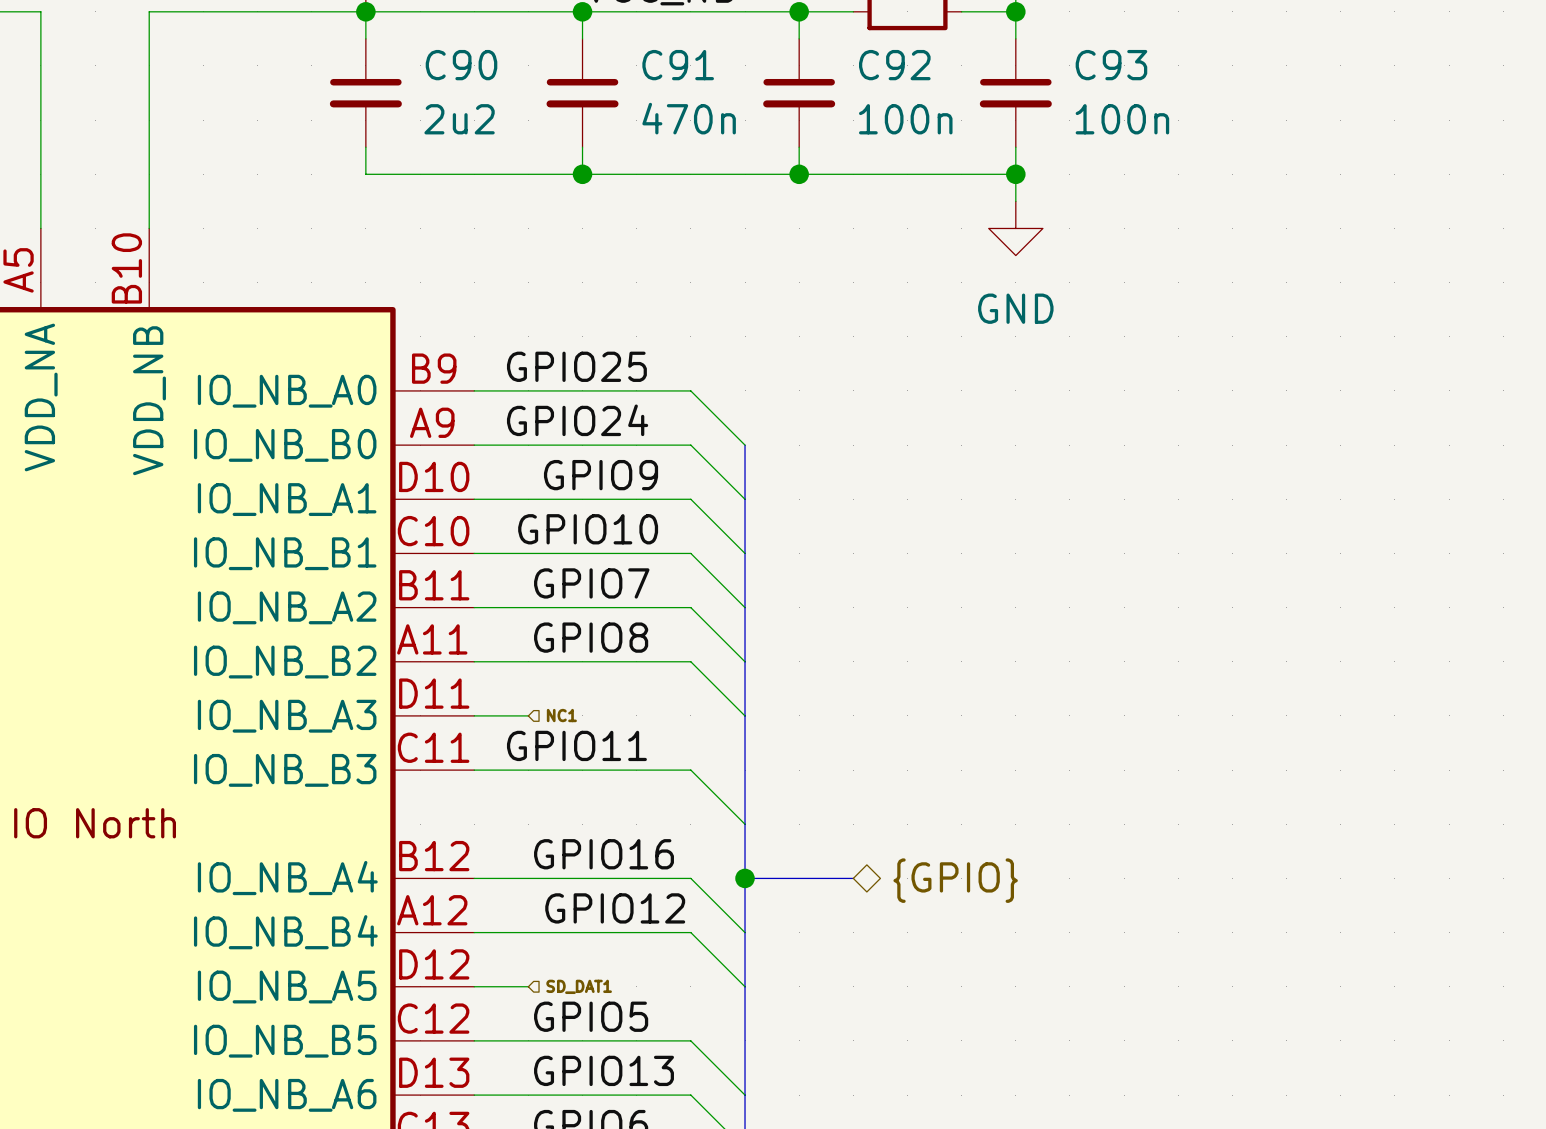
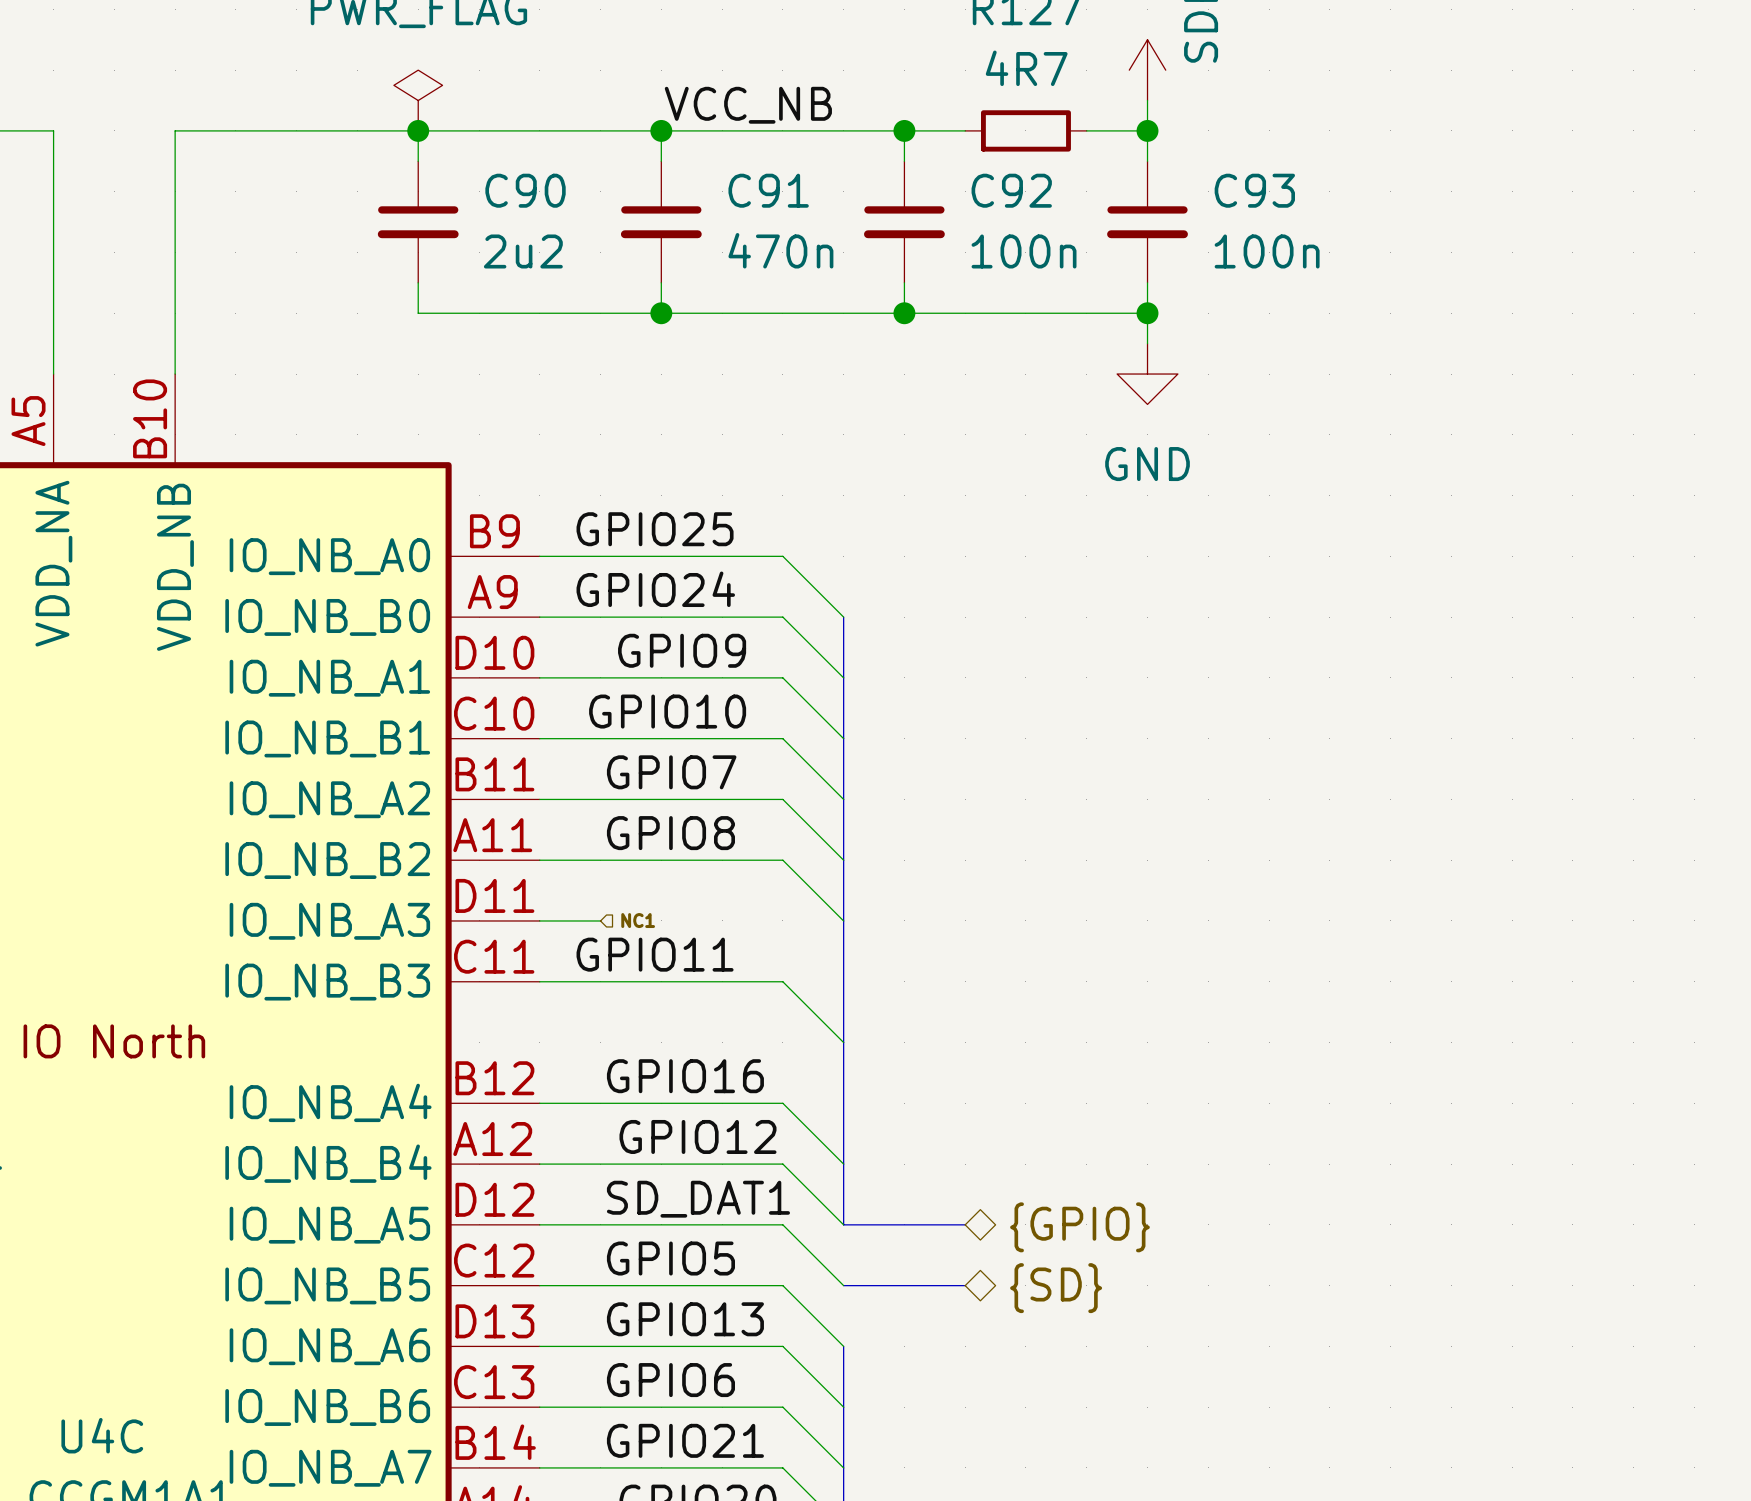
bus: (745, 878) (853, 878) -> (843, 1285) (965, 1285)
junction: (745, 878) -> none
hierarchical label position: {GPIO} (955, 880) -> {GPIO} (1079, 1227)
label: none -> SD_DAT1 (698, 1199)
wire: none -> (600, 1224) (782, 1224) (843, 1285)
hierarchical label: SD_DAT1 (579, 986) -> none
bus: (745, 986) (745, 1095) -> (843, 1224) (965, 1224)
hierarchical label: none -> {SD} (1056, 1288)

